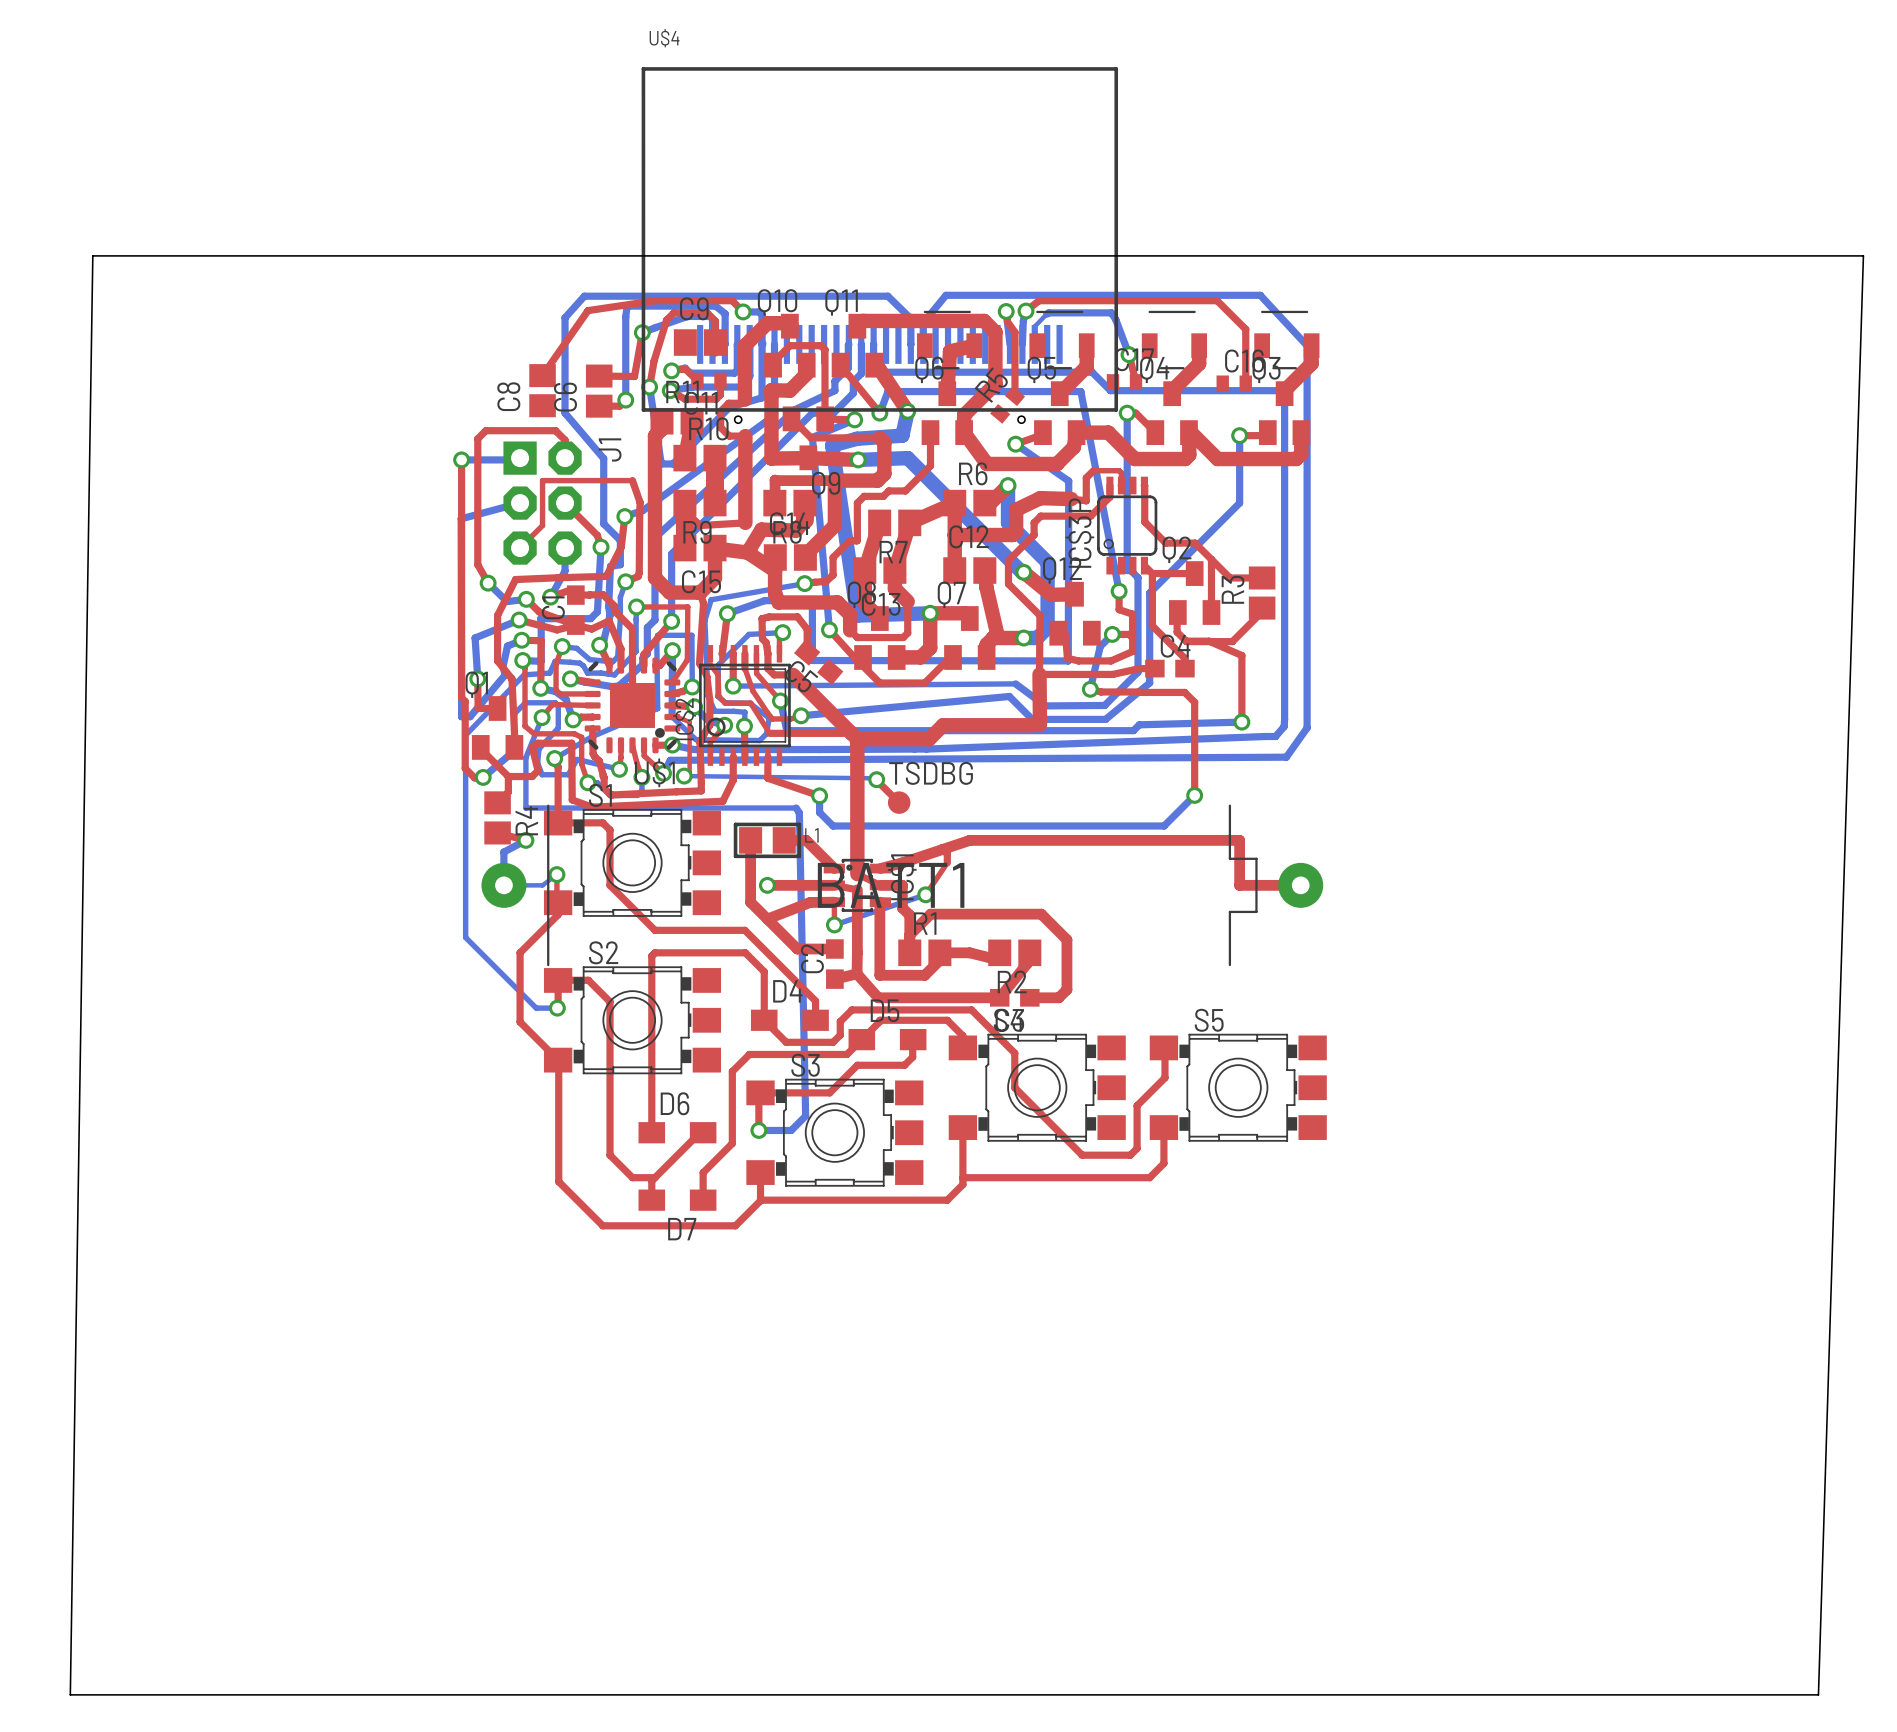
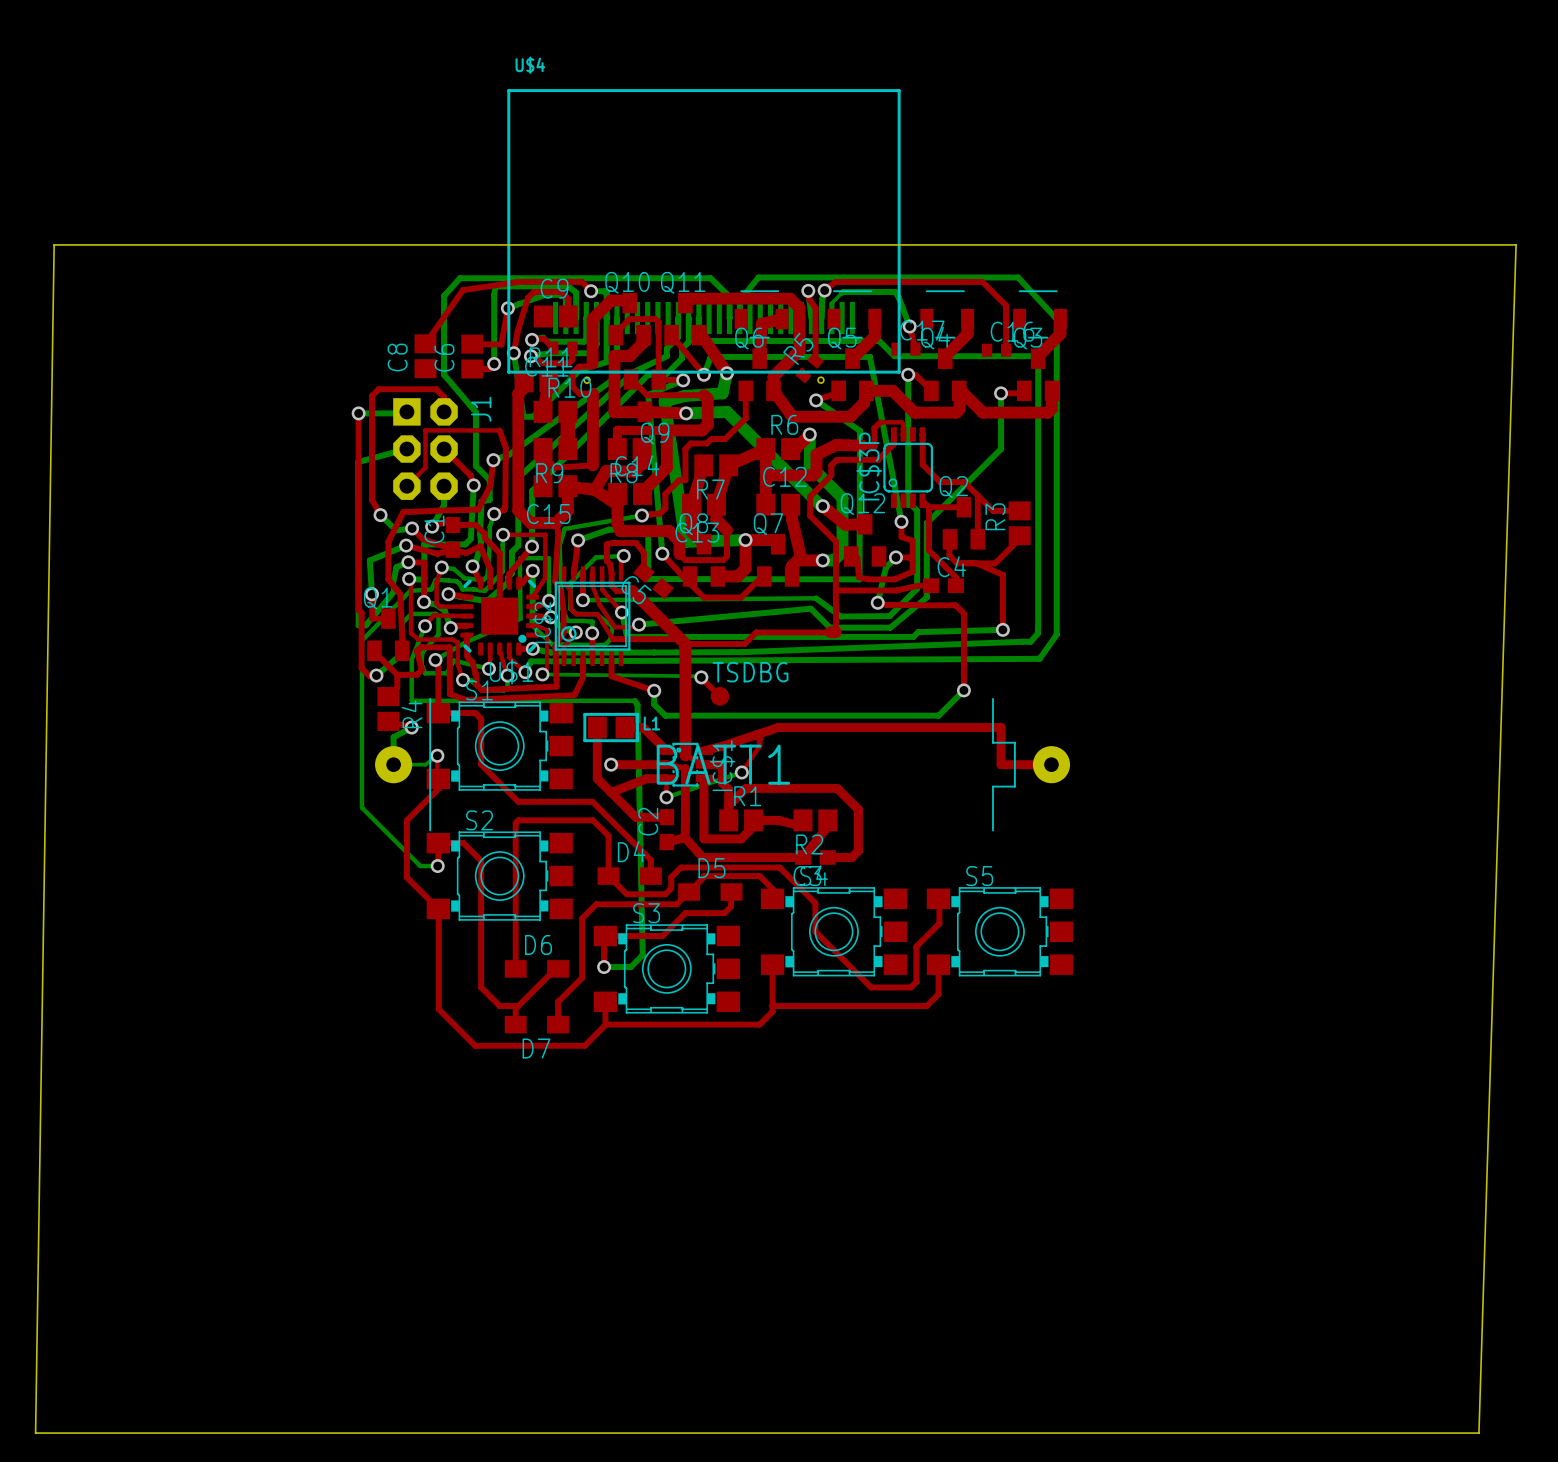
top track width: thick (1039, 674) (1039, 724) -> thin (835, 590) (836, 631)
top track width: thick (1032, 725) (943, 725) (929, 739) (857, 739) -> thin (830, 632) (756, 632) (744, 643) (685, 643)

